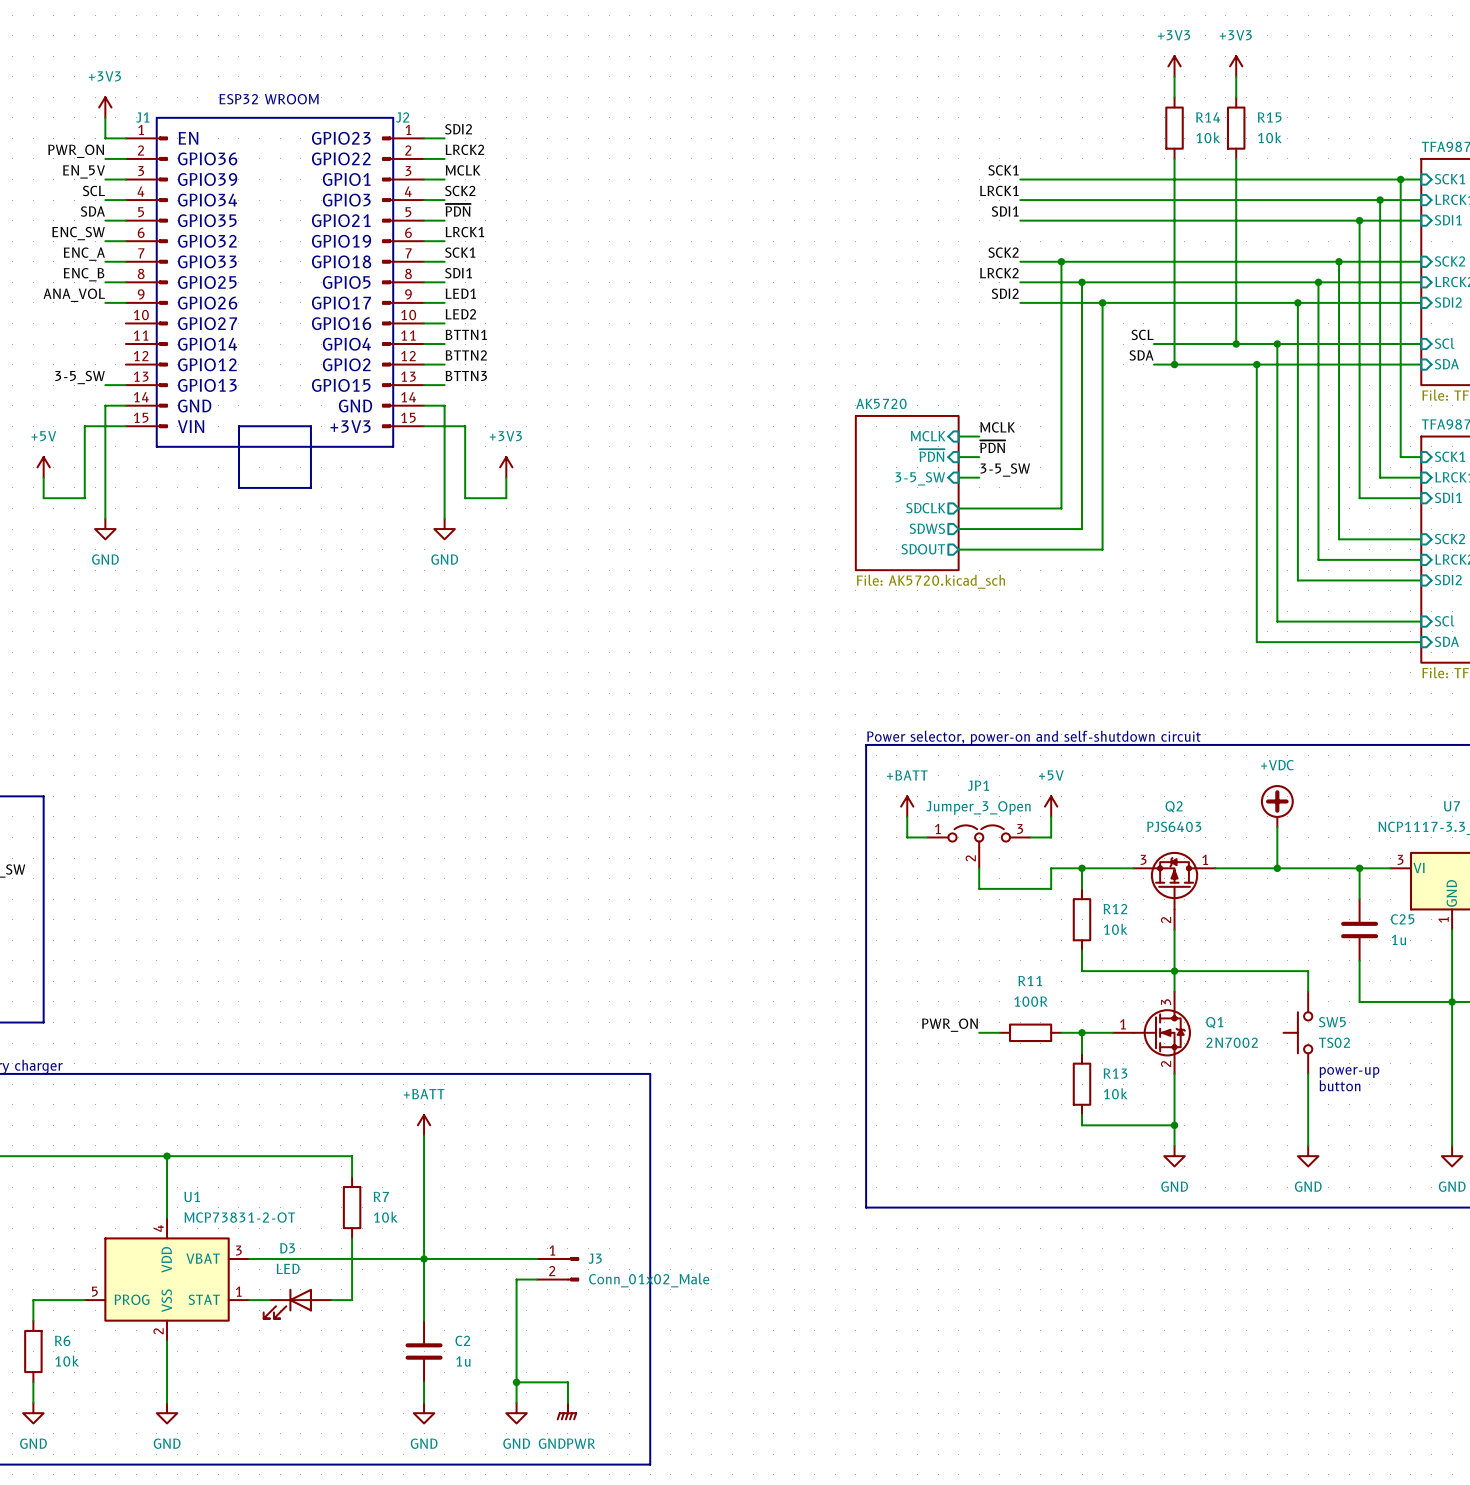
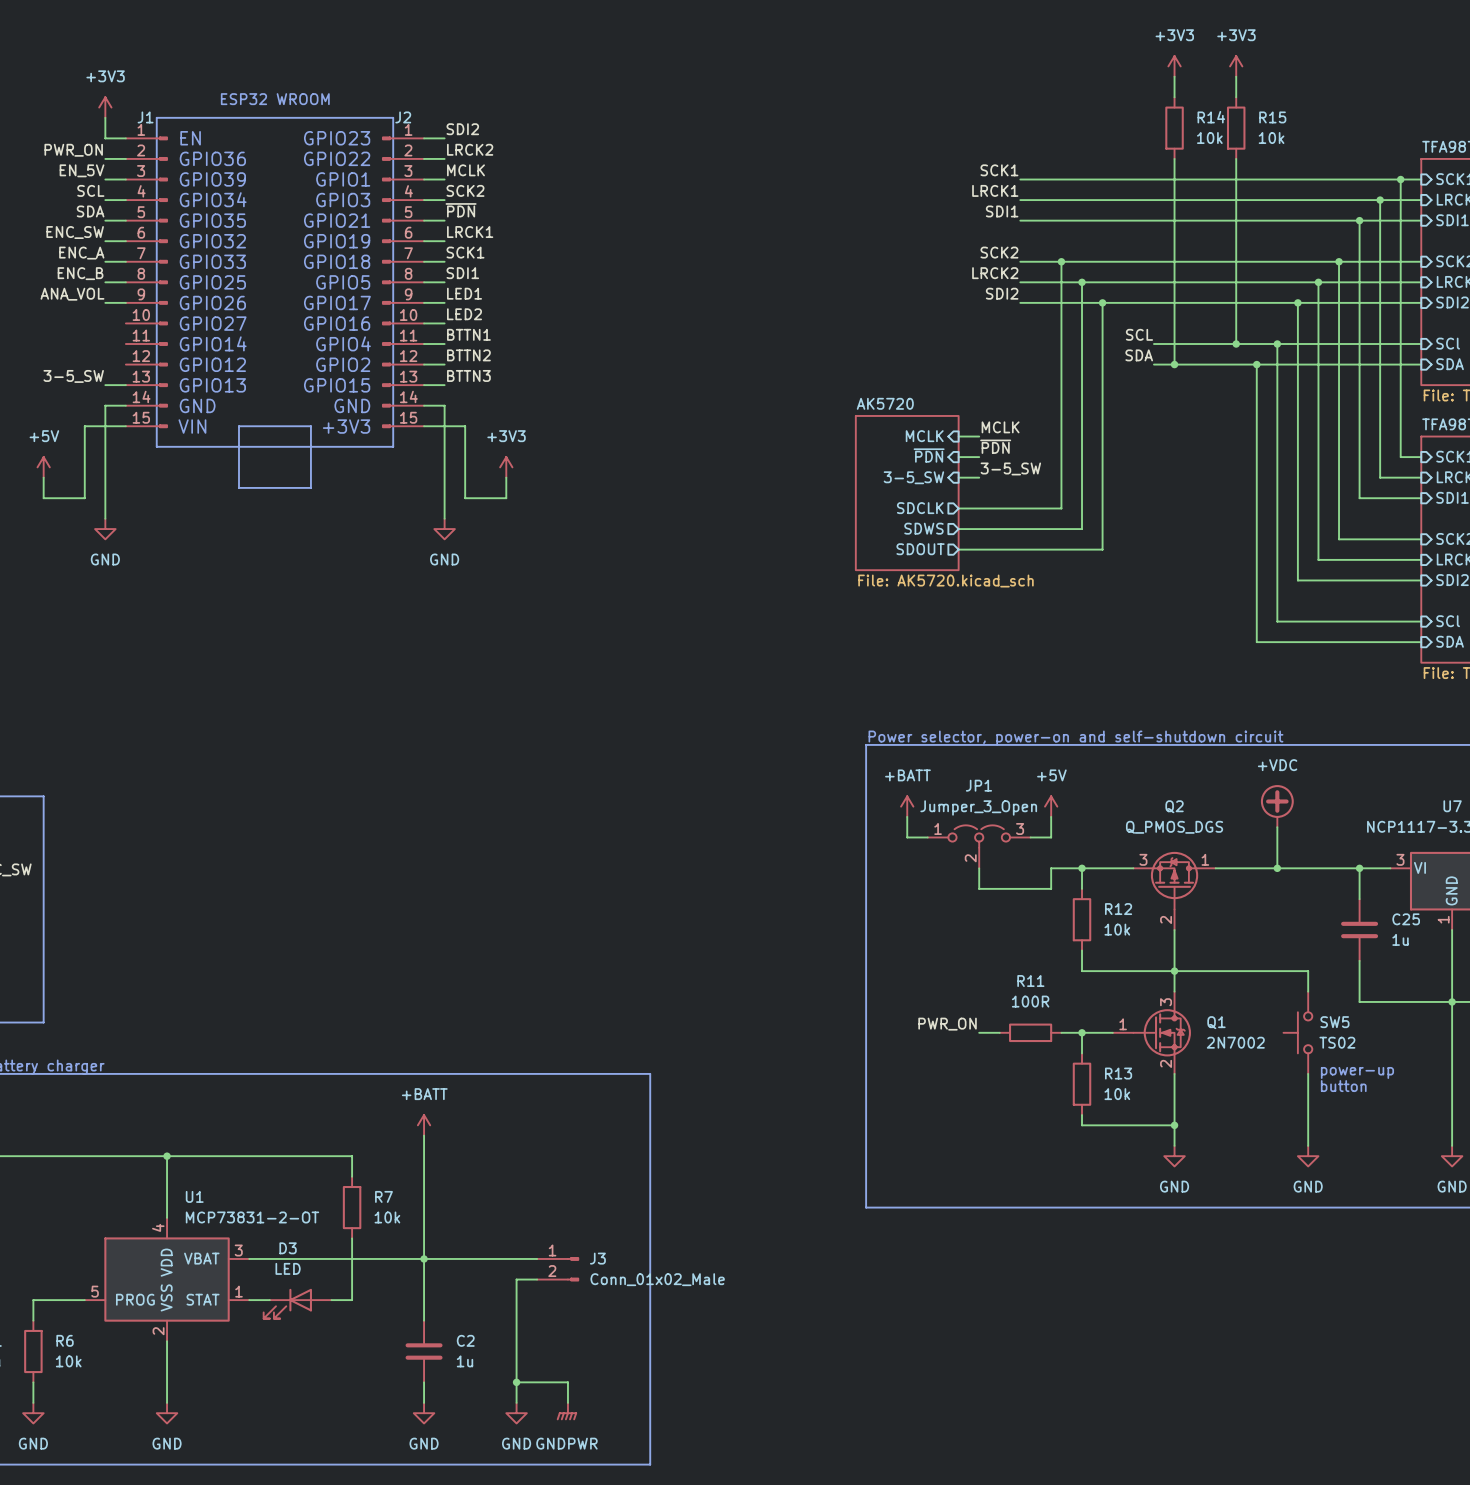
Q2 value: PJS6403 (1174, 826) -> Q_PMOS_DGS (1174, 827)

